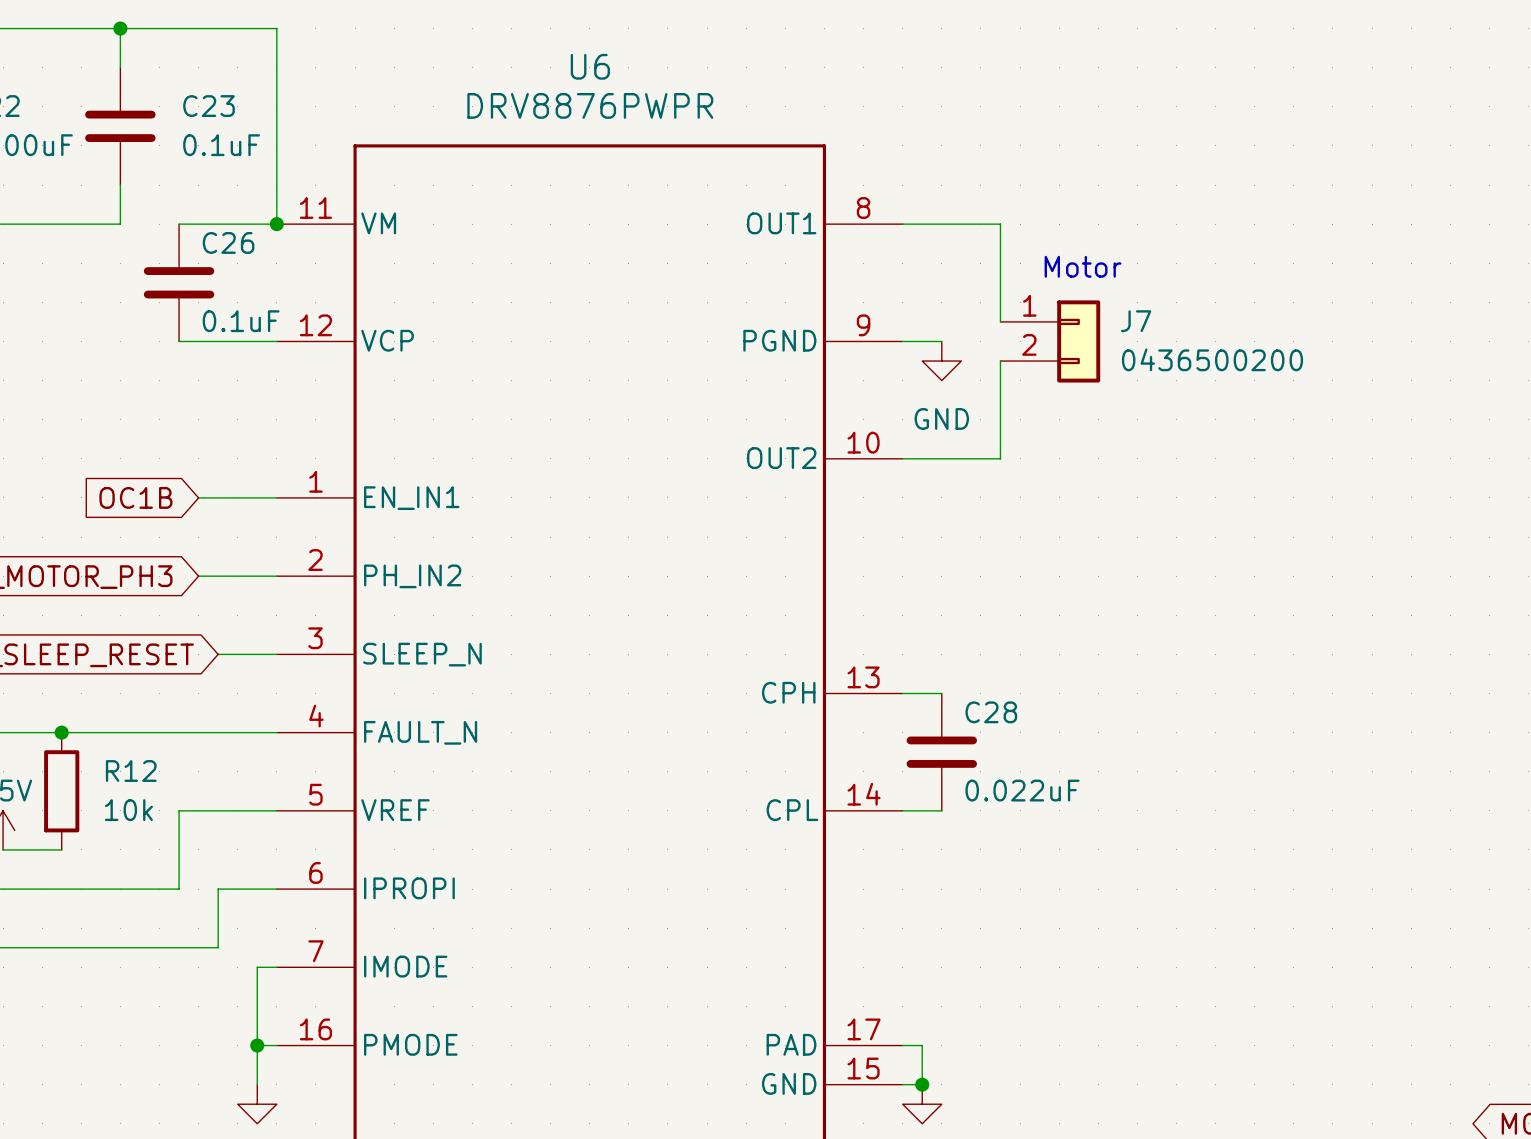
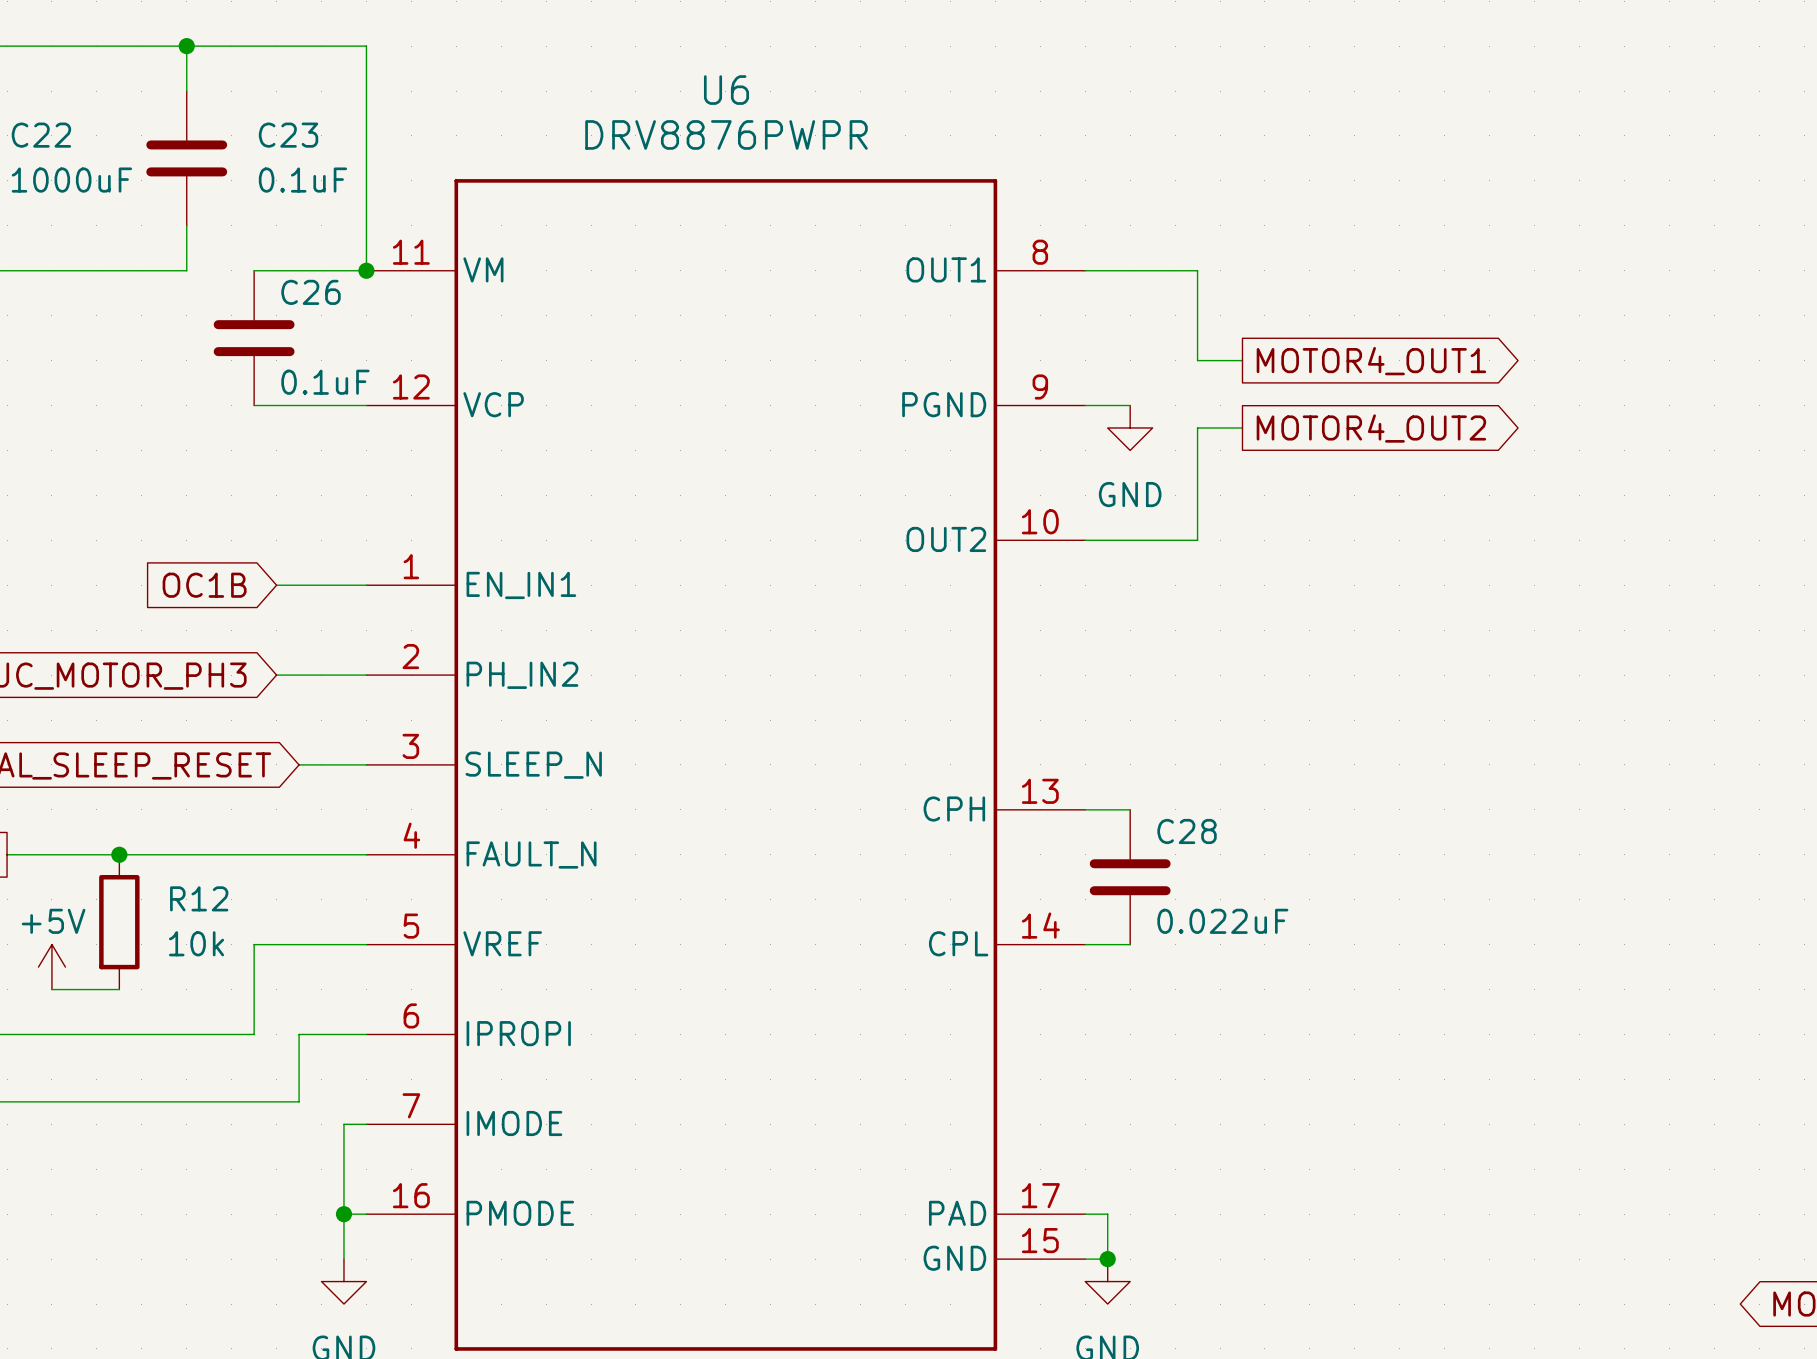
text: Motor (1083, 266) -> none
wire: (1000, 302) (1000, 321) -> (1197, 360) (1242, 360)
global label: none -> MOTOR4_OUT1 (1371, 361)
J7: 0436500200 (1050, 341) -> none
global label: none -> MOTOR4_OUT2 (1371, 428)

